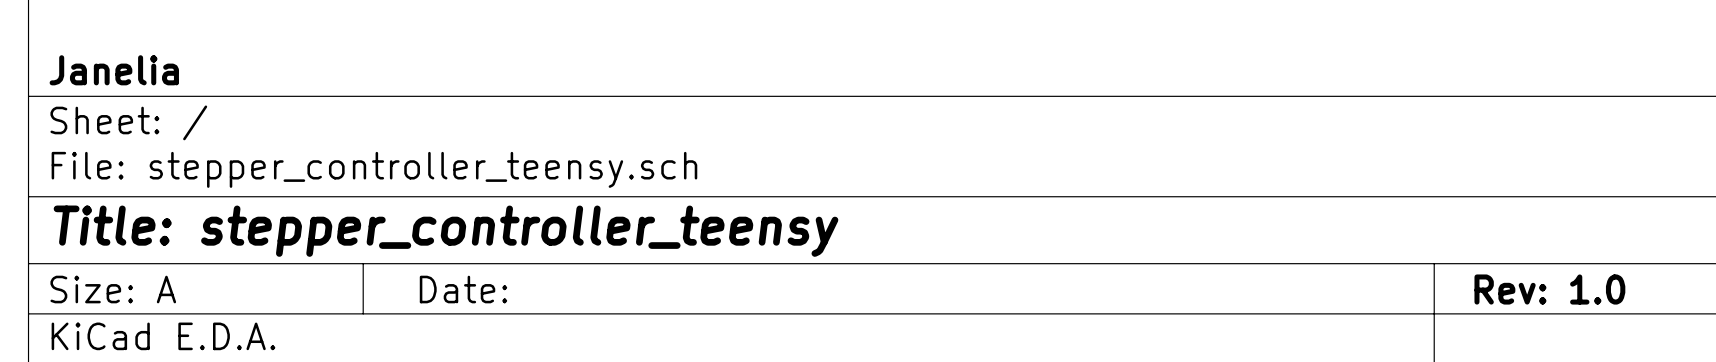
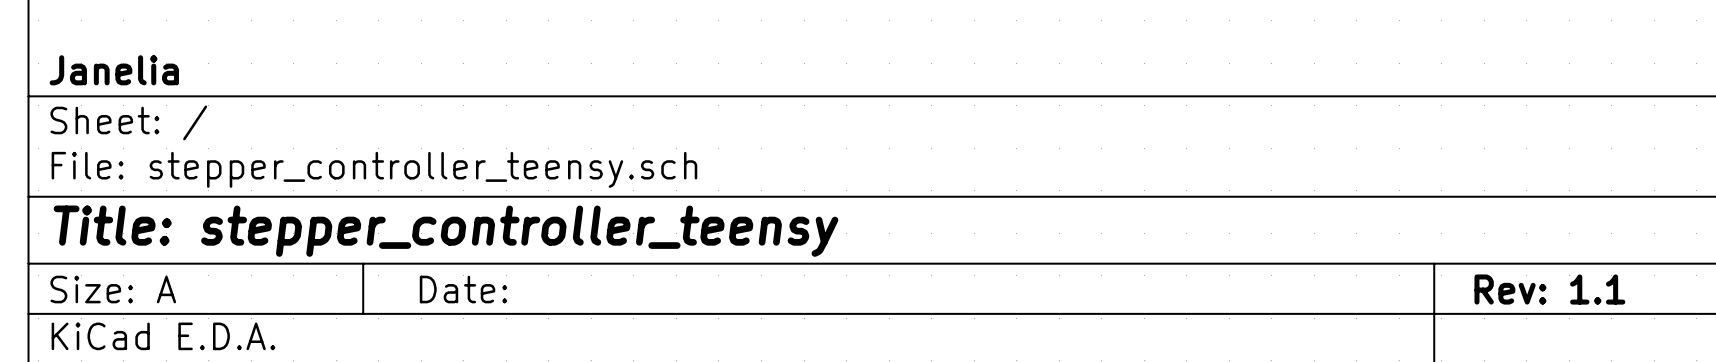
title block: Rev: 1.0 (1549, 289) -> Rev: 1.1 (1549, 289)

